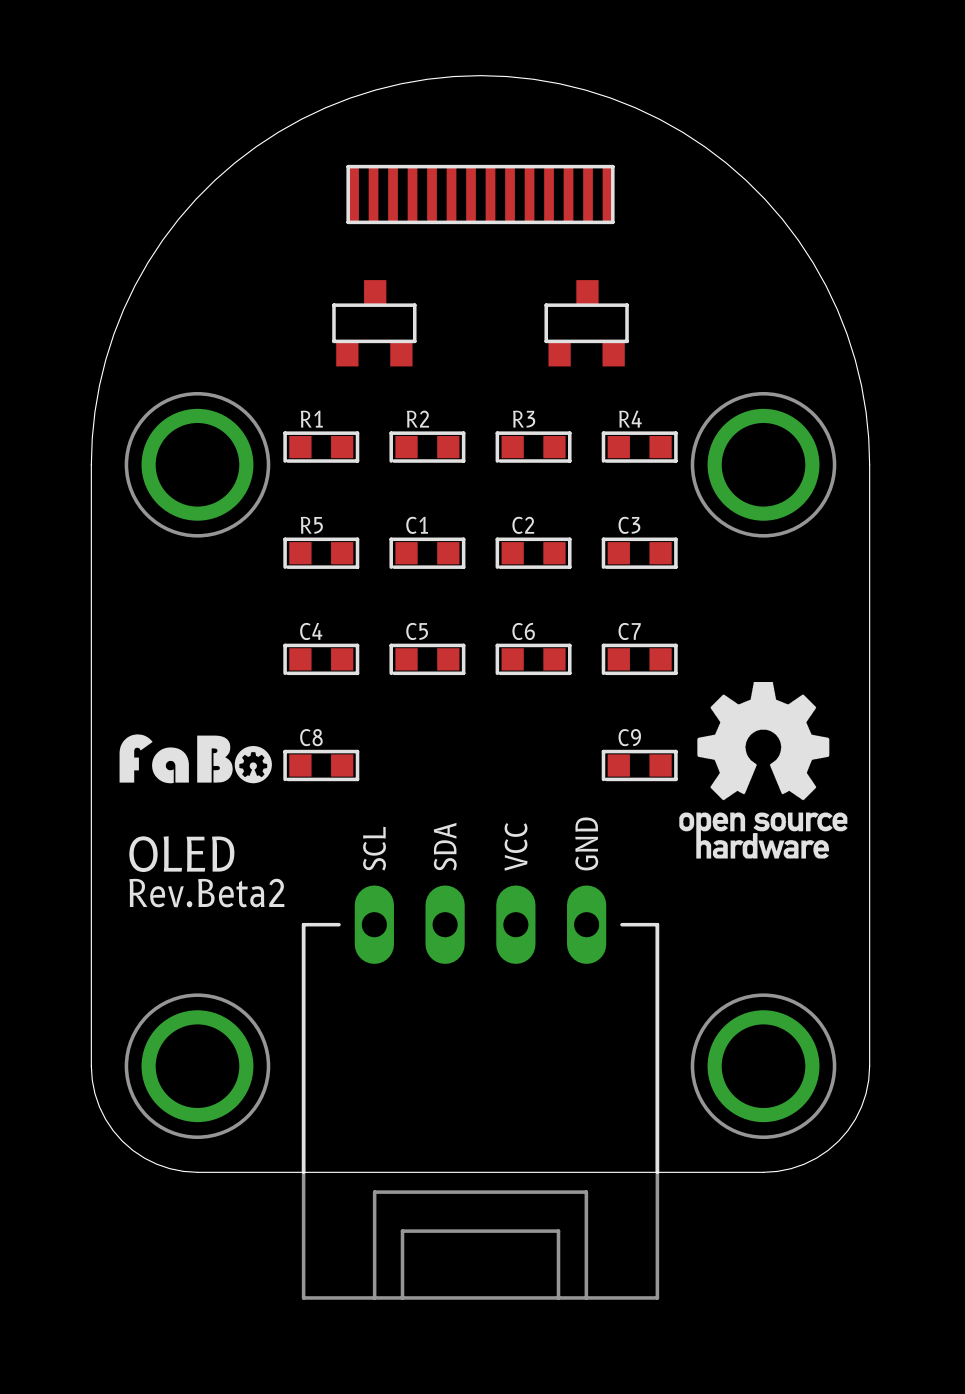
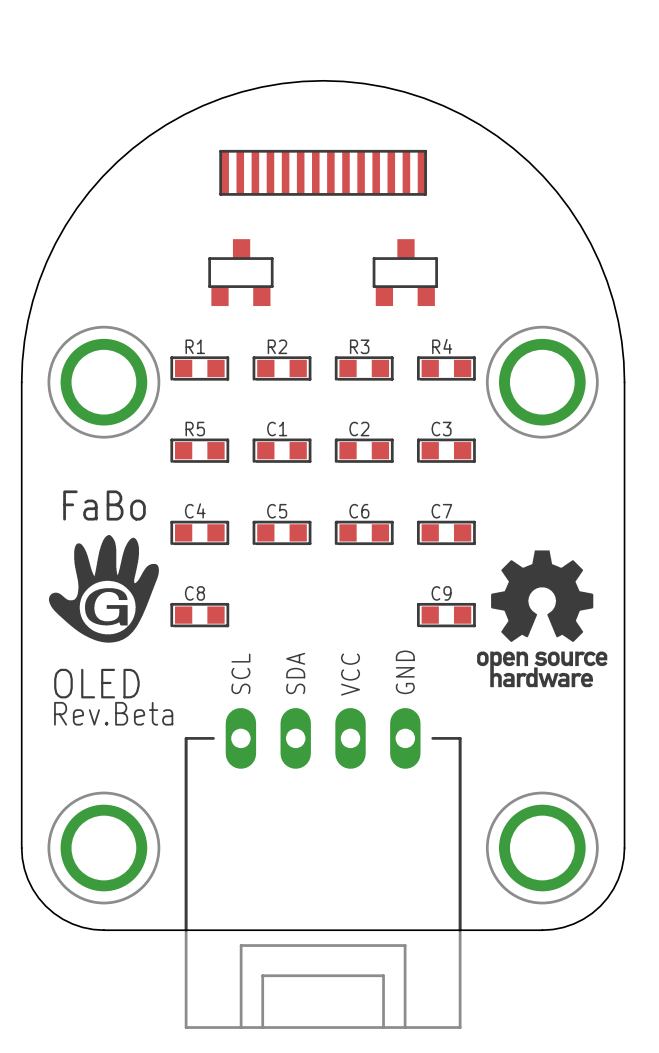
drawing shape: [119, 734, 272, 784] -> [48, 490, 159, 643]
text: Rev.Beta2 (206, 893) -> Rev.Beta (113, 713)

